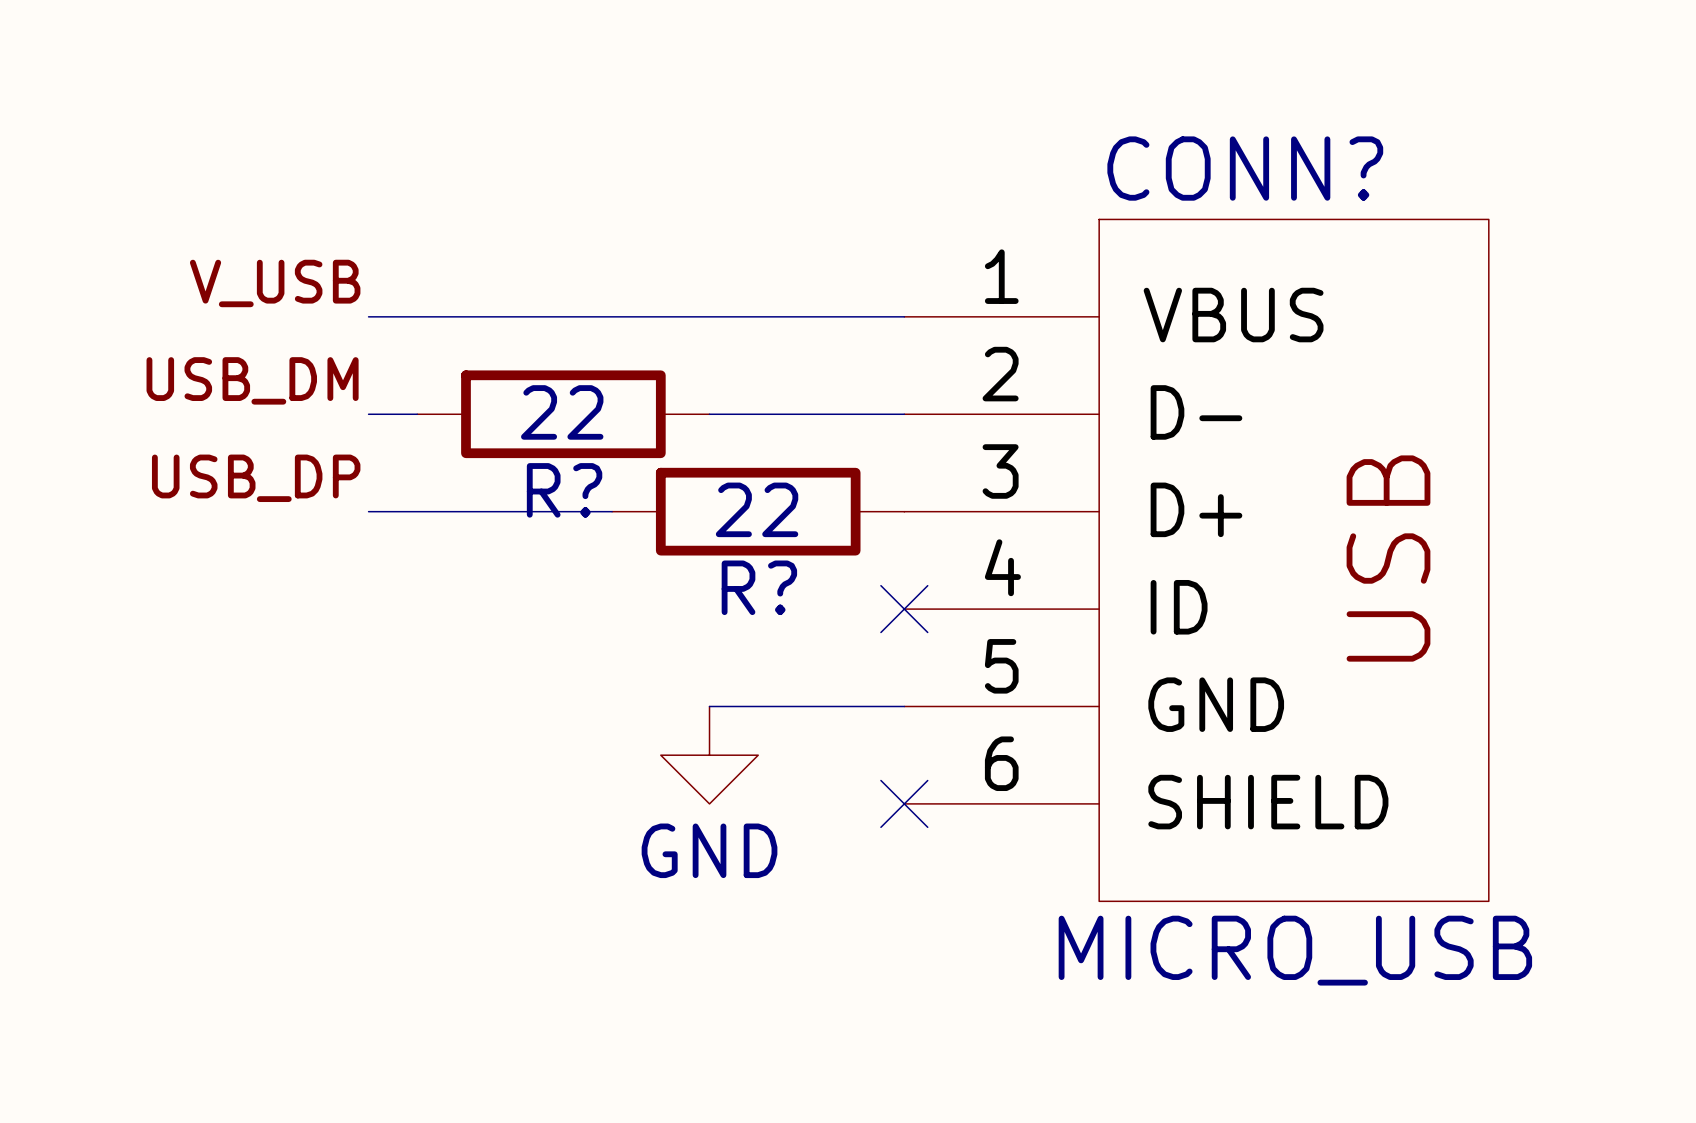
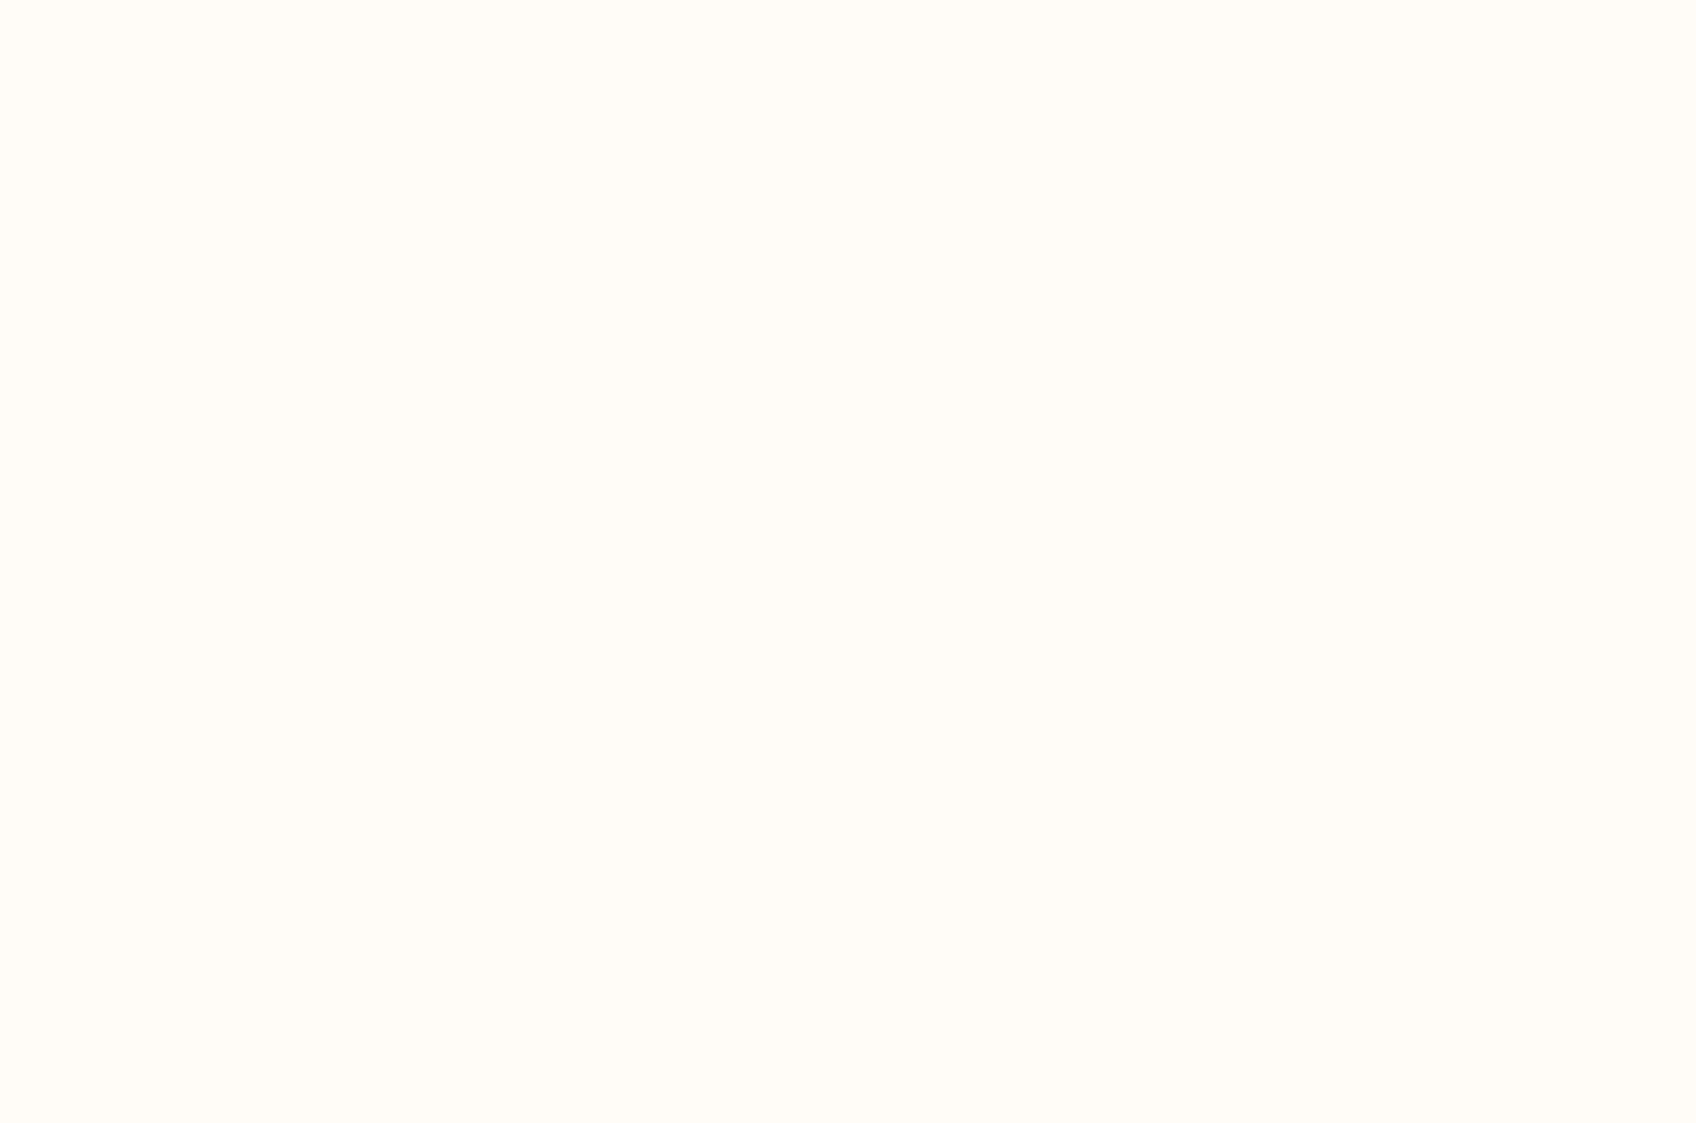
label: V_USB (275, 283) -> none
wire: (368, 316) (904, 316) -> none
label: USB_DM (252, 380) -> none
wire: (368, 414) (417, 414) -> none
R?: 22 (563, 414) -> none
wire: (709, 414) (904, 414) -> none
label: USB_DP (256, 478) -> none
wire: (368, 511) (612, 511) -> none
R?: 22 (758, 511) -> none
CONN?: MICRO_USB (1196, 560) -> none
no-connect mark: (904, 609) -> none
wire: (709, 706) (904, 706) -> none
power symbol: GND (709, 755) -> none
no-connect mark: (904, 803) -> none

